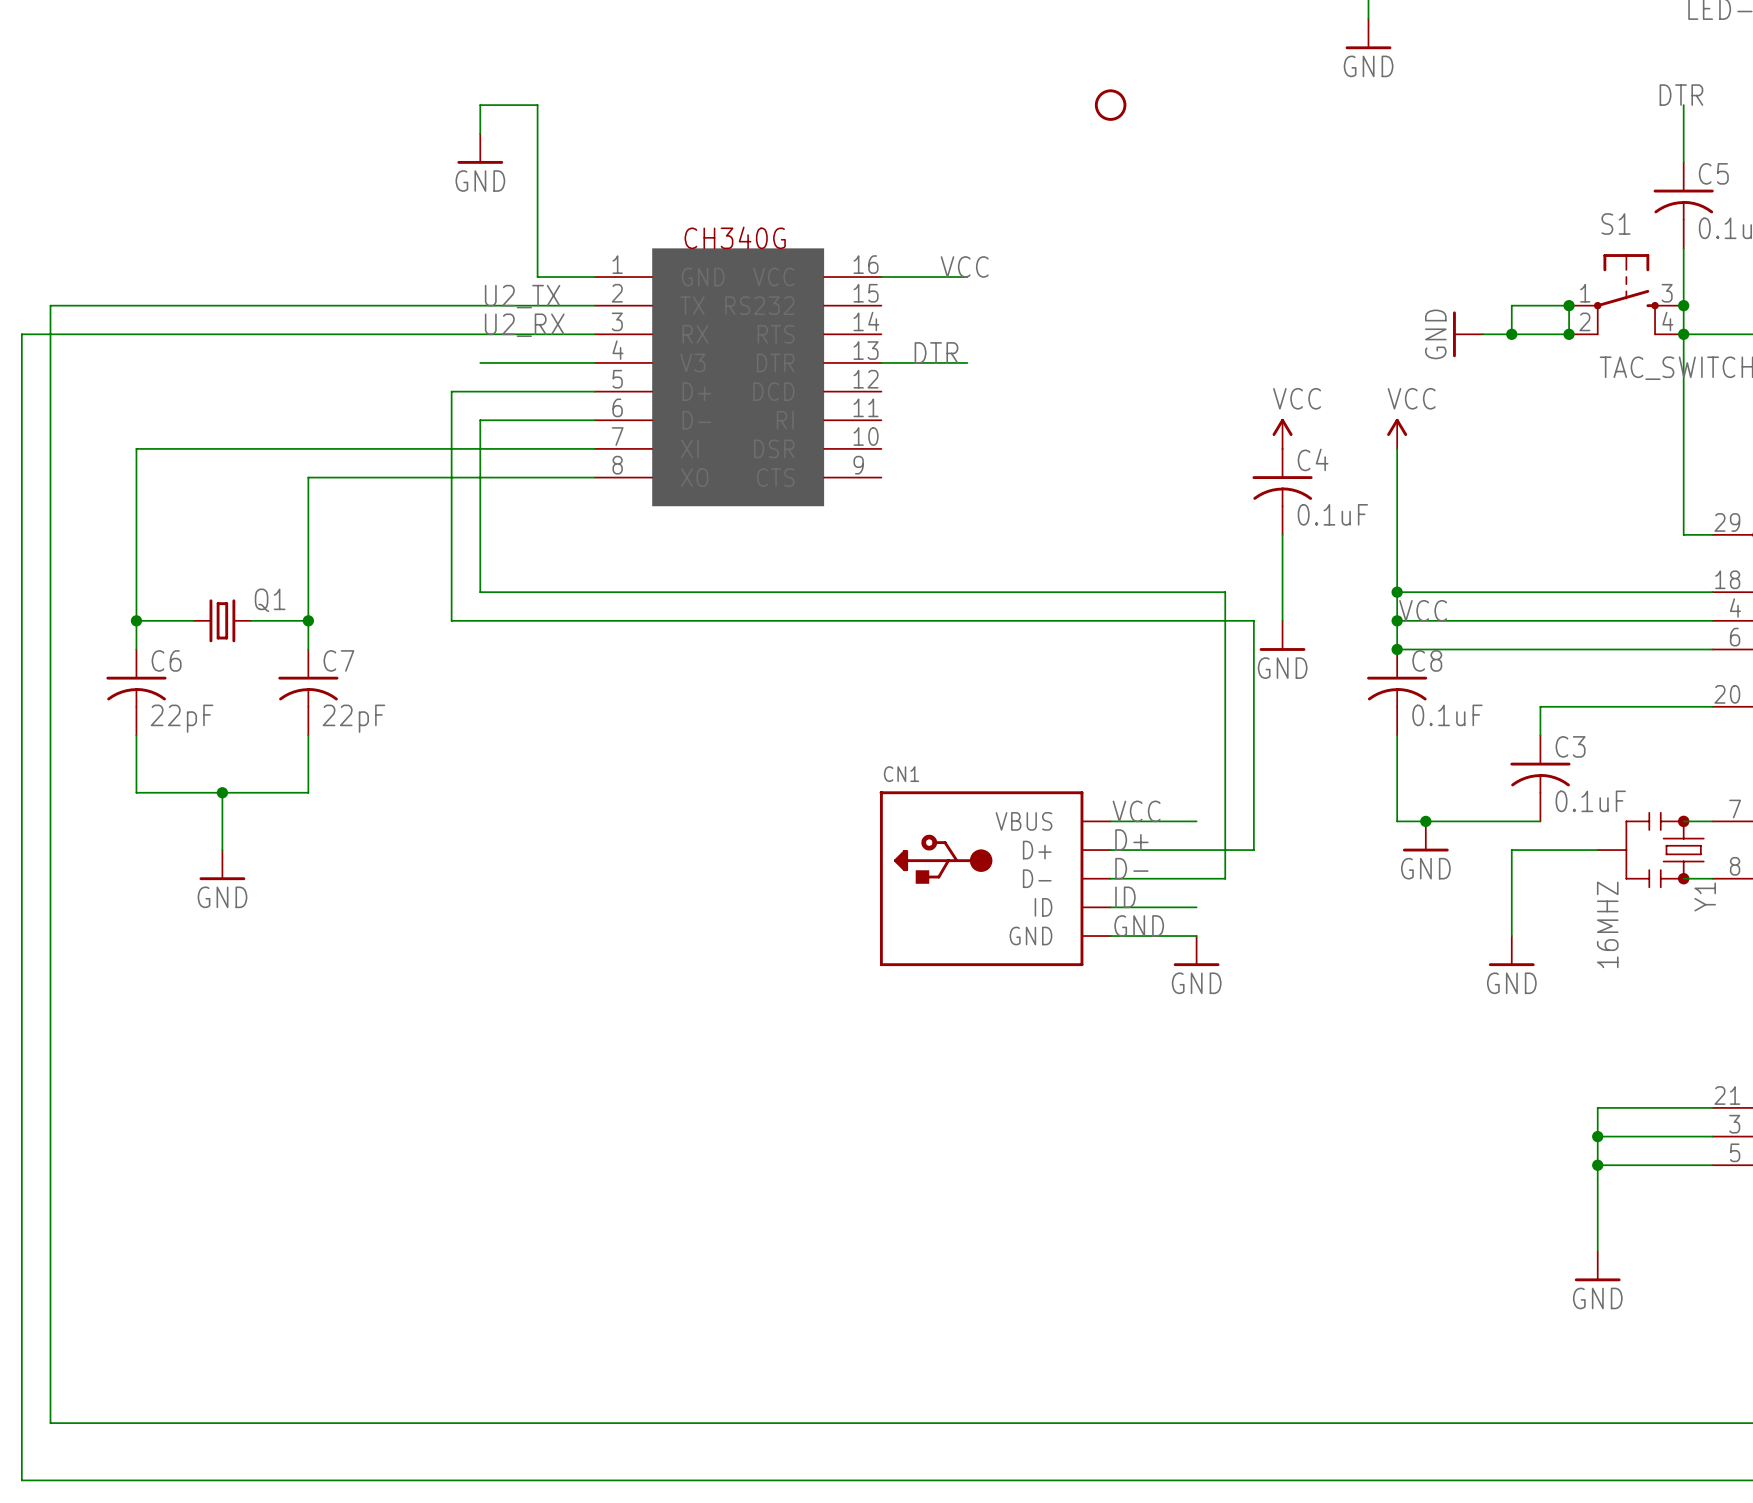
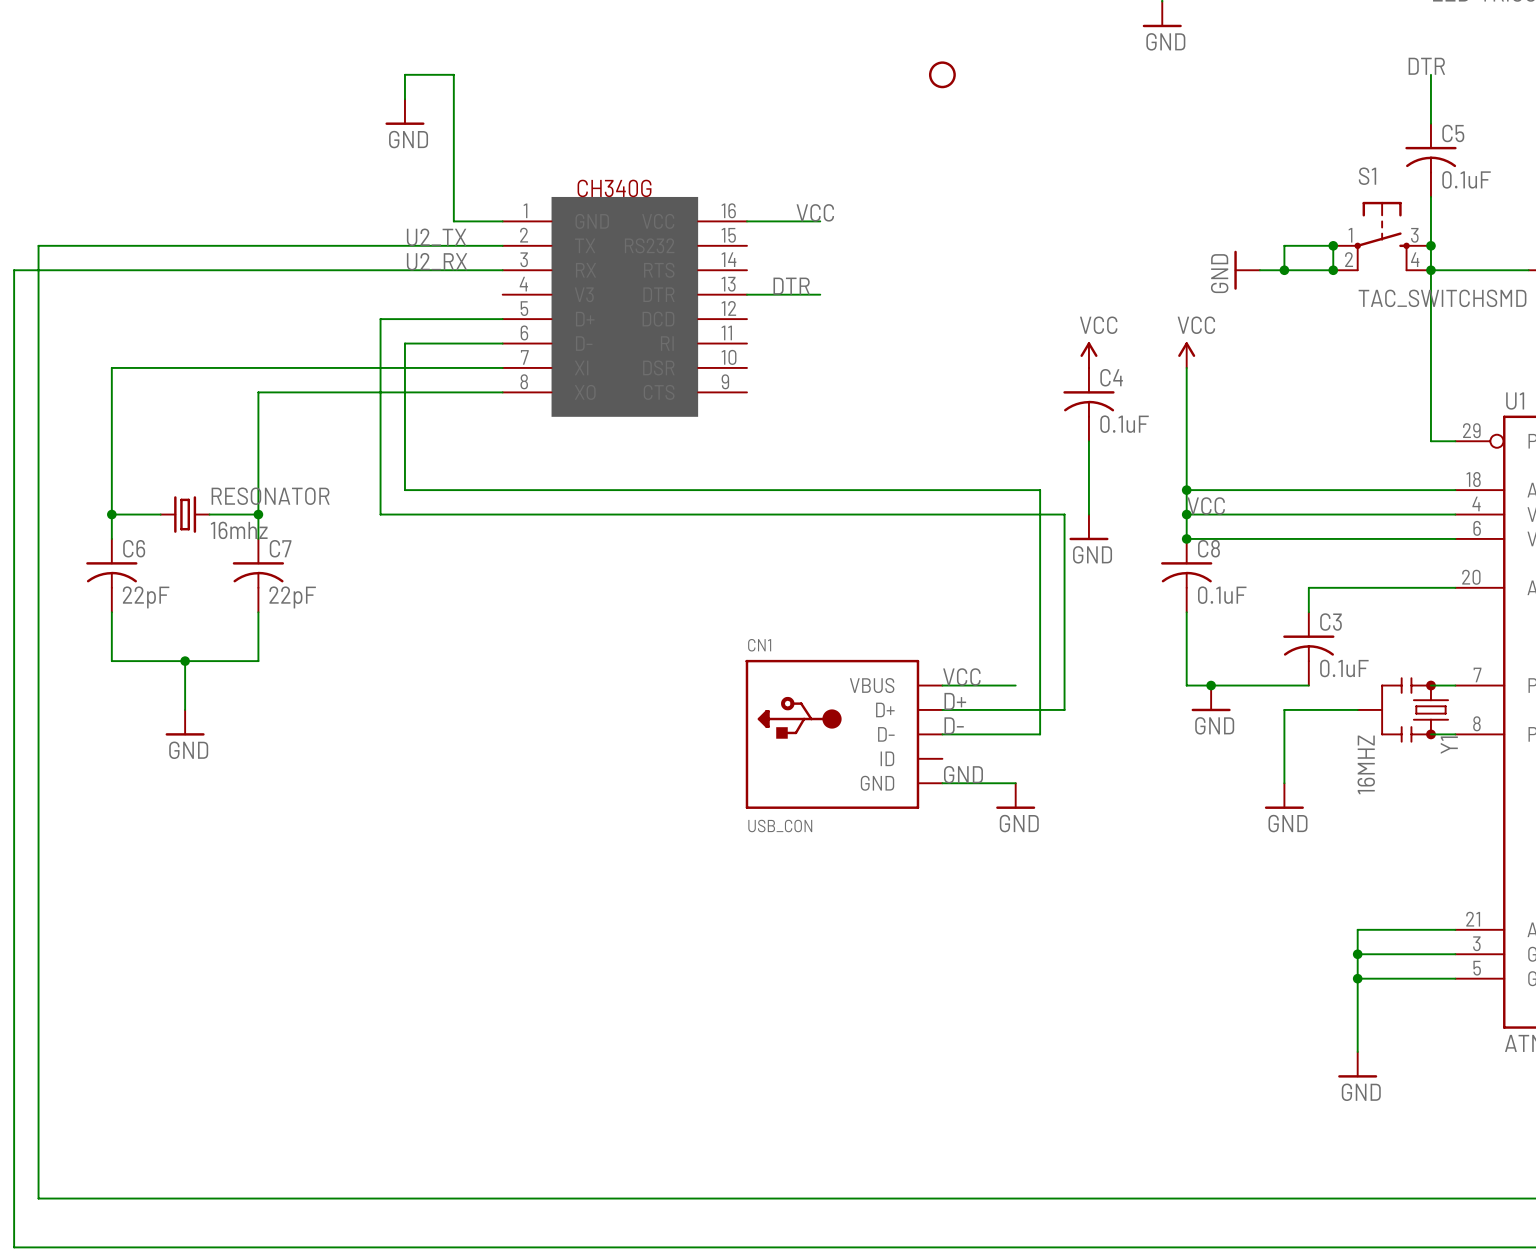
wire: (480, 362) (594, 362) -> none
Q1 name: Q1 (270, 600) -> RESONATOR (270, 496)
Q1 value: none -> 16mhz (239, 530)
label: ID (1125, 897) -> none
wire: (1110, 907) (1196, 907) -> none
CN1 value: none -> USB_CON (780, 826)

